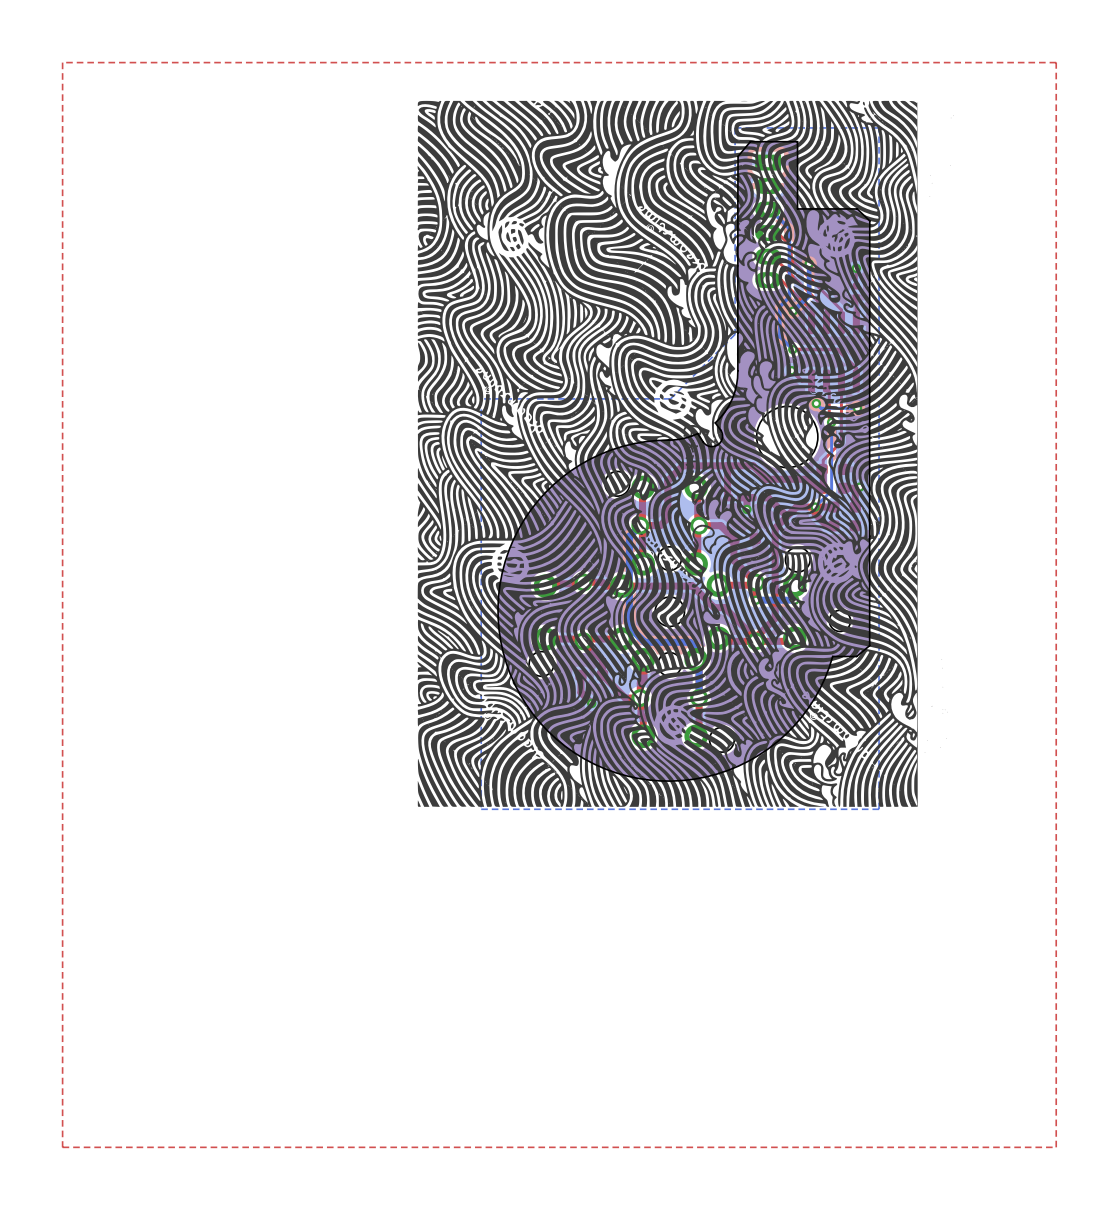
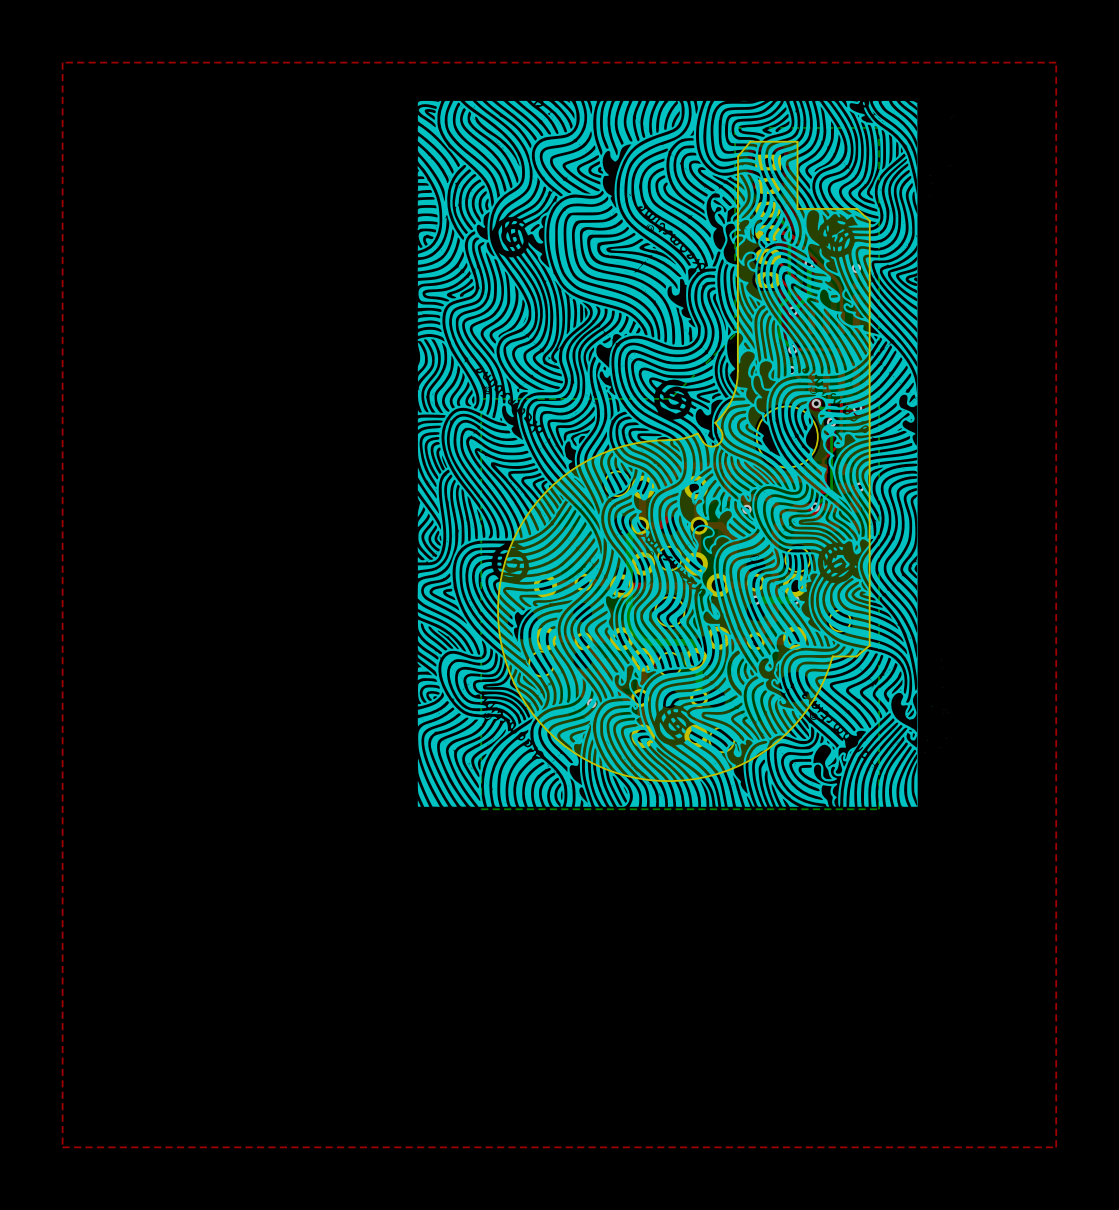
drawing: none -> [417, 100, 954, 807]
top track: (777, 233) (791, 246) (791, 259) (841, 309) -> (777, 233) (791, 236) (837, 281) (841, 293) (841, 322)
part: (685, 453) -> none
top track: (692, 586) (714, 607) (724, 607) (755, 638) -> none

